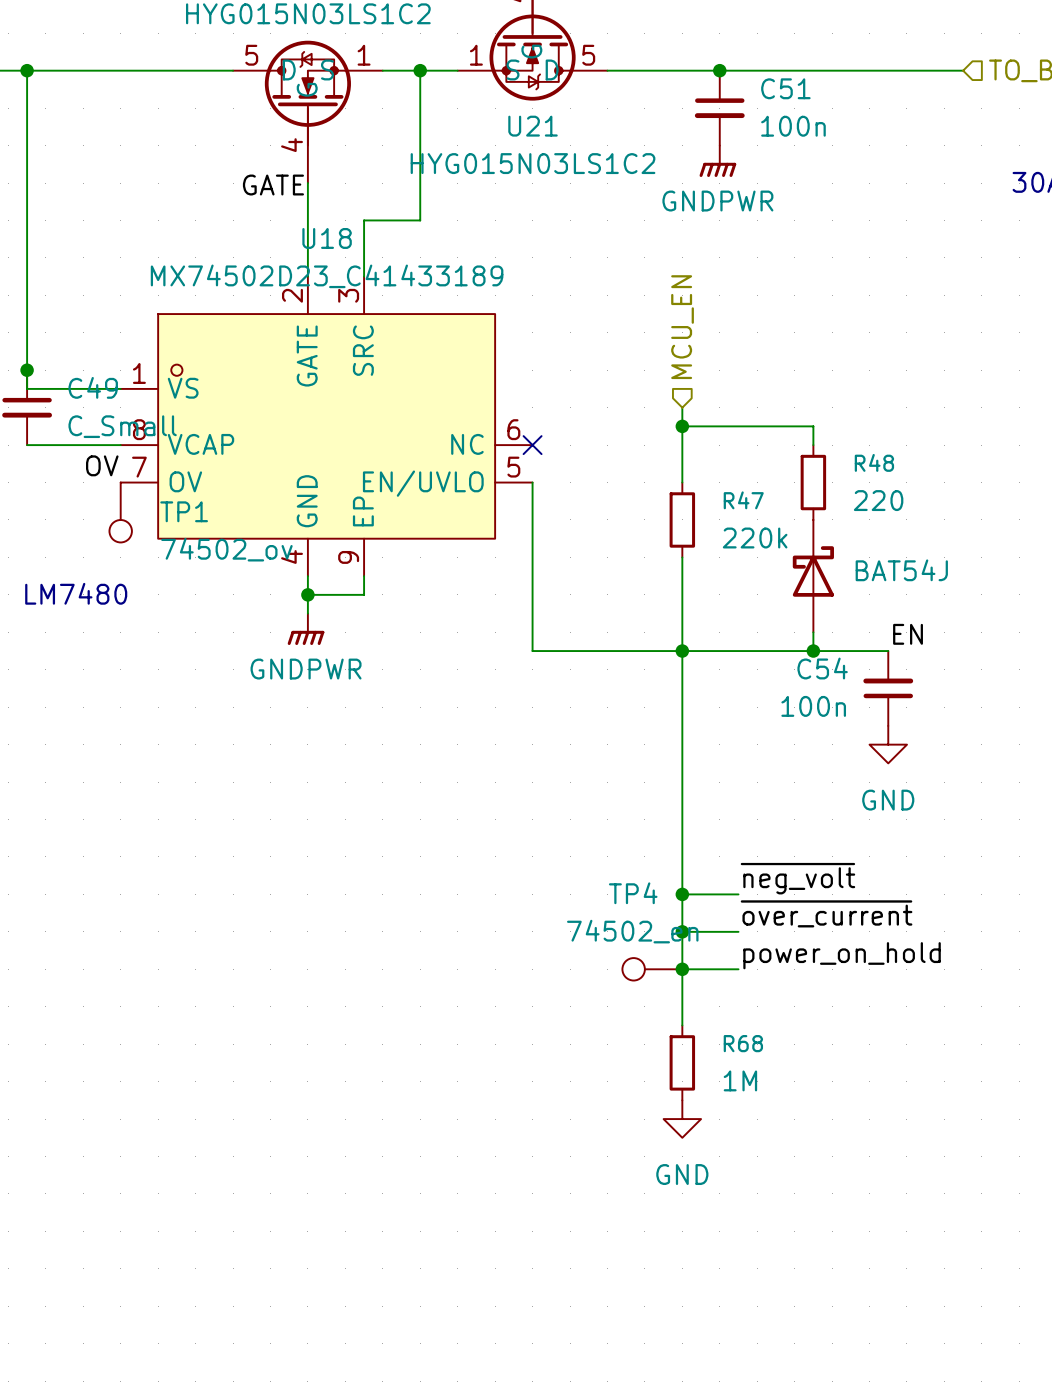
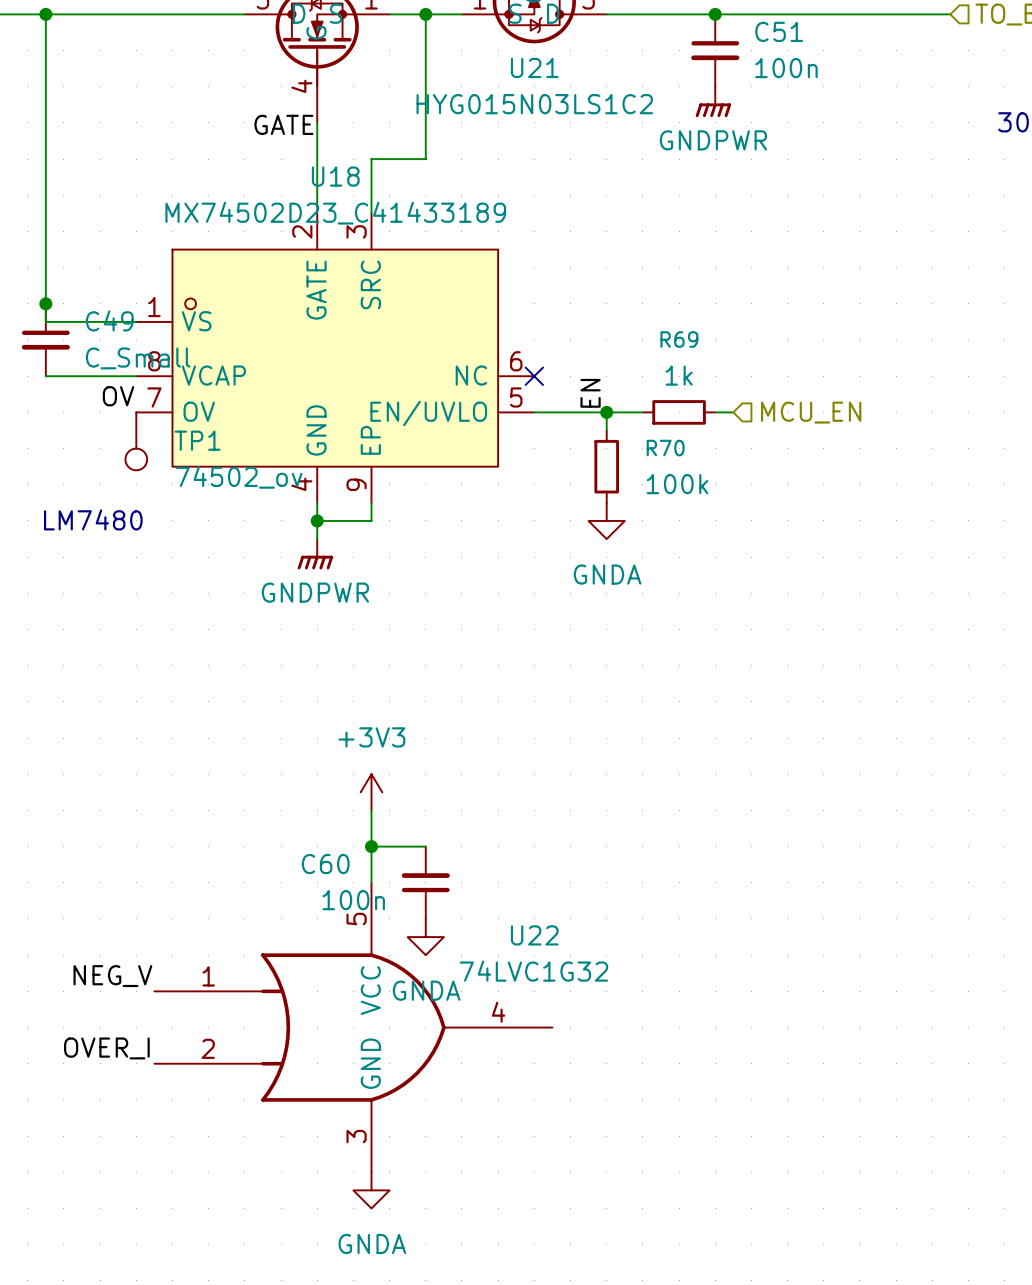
hierarchical label rotation: 0° (682, 327) -> 90° clockwise (811, 412)
hierarchical label position: MCU_EN (682, 327) -> MCU_EN (811, 412)
wire: (682, 407) (682, 482) -> none
wire: (682, 426) (813, 426) (813, 445) -> none
junction: (682, 426) -> none
wire: (532, 482) (532, 651) (888, 651) -> (534, 412) (642, 412)
junction: none -> (606, 412)
R69: none -> 1k (679, 412)
wire: none -> (715, 412) (733, 412)
R48: 220 (813, 482) -> none
R47: 220k (682, 519) -> none
R70: none -> 100k (606, 466)
wire: (682, 557) (682, 1025) -> none
part: BAT54J (813, 576) -> none
power symbol: none -> GNDA (606, 520)
wire: (813, 632) (813, 651) -> (606, 412) (606, 430)
label rotation: 0° (908, 634) -> 90° counterclockwise (590, 393)
label position: EN (908, 634) -> EN (590, 393)
junction: (682, 651) -> none
junction: (813, 651) -> none
C54: 100n (888, 688) -> none
power symbol: GND (888, 744) -> none
power symbol: none -> +3V3 (371, 792)
label: ~{neg_volt} (797, 878) -> none
wire: none -> (371, 810) (371, 882)
wire: (682, 894) (738, 894) -> none
junction: (682, 894) -> none
label: ~{over_current} (826, 913) -> none
junction: none -> (371, 846)
wire: (682, 931) (738, 931) -> (371, 846) (425, 846)
junction: (682, 931) -> none
label: power_on_hold (842, 955) -> none
C60: none -> 100n (425, 882)
TP4: 74502_en (652, 969) -> none
wire: (682, 969) (738, 969) -> none
junction: (682, 969) -> none
power symbol: none -> GNDA (425, 937)
R68: 1M (682, 1062) -> none
label: none -> NEG_V (112, 976)
U22: none -> 74LVC1G32 (353, 1027)
power symbol: GND (682, 1119) -> none
label: none -> OVER_I (106, 1048)
power symbol: none -> GNDA (371, 1190)

